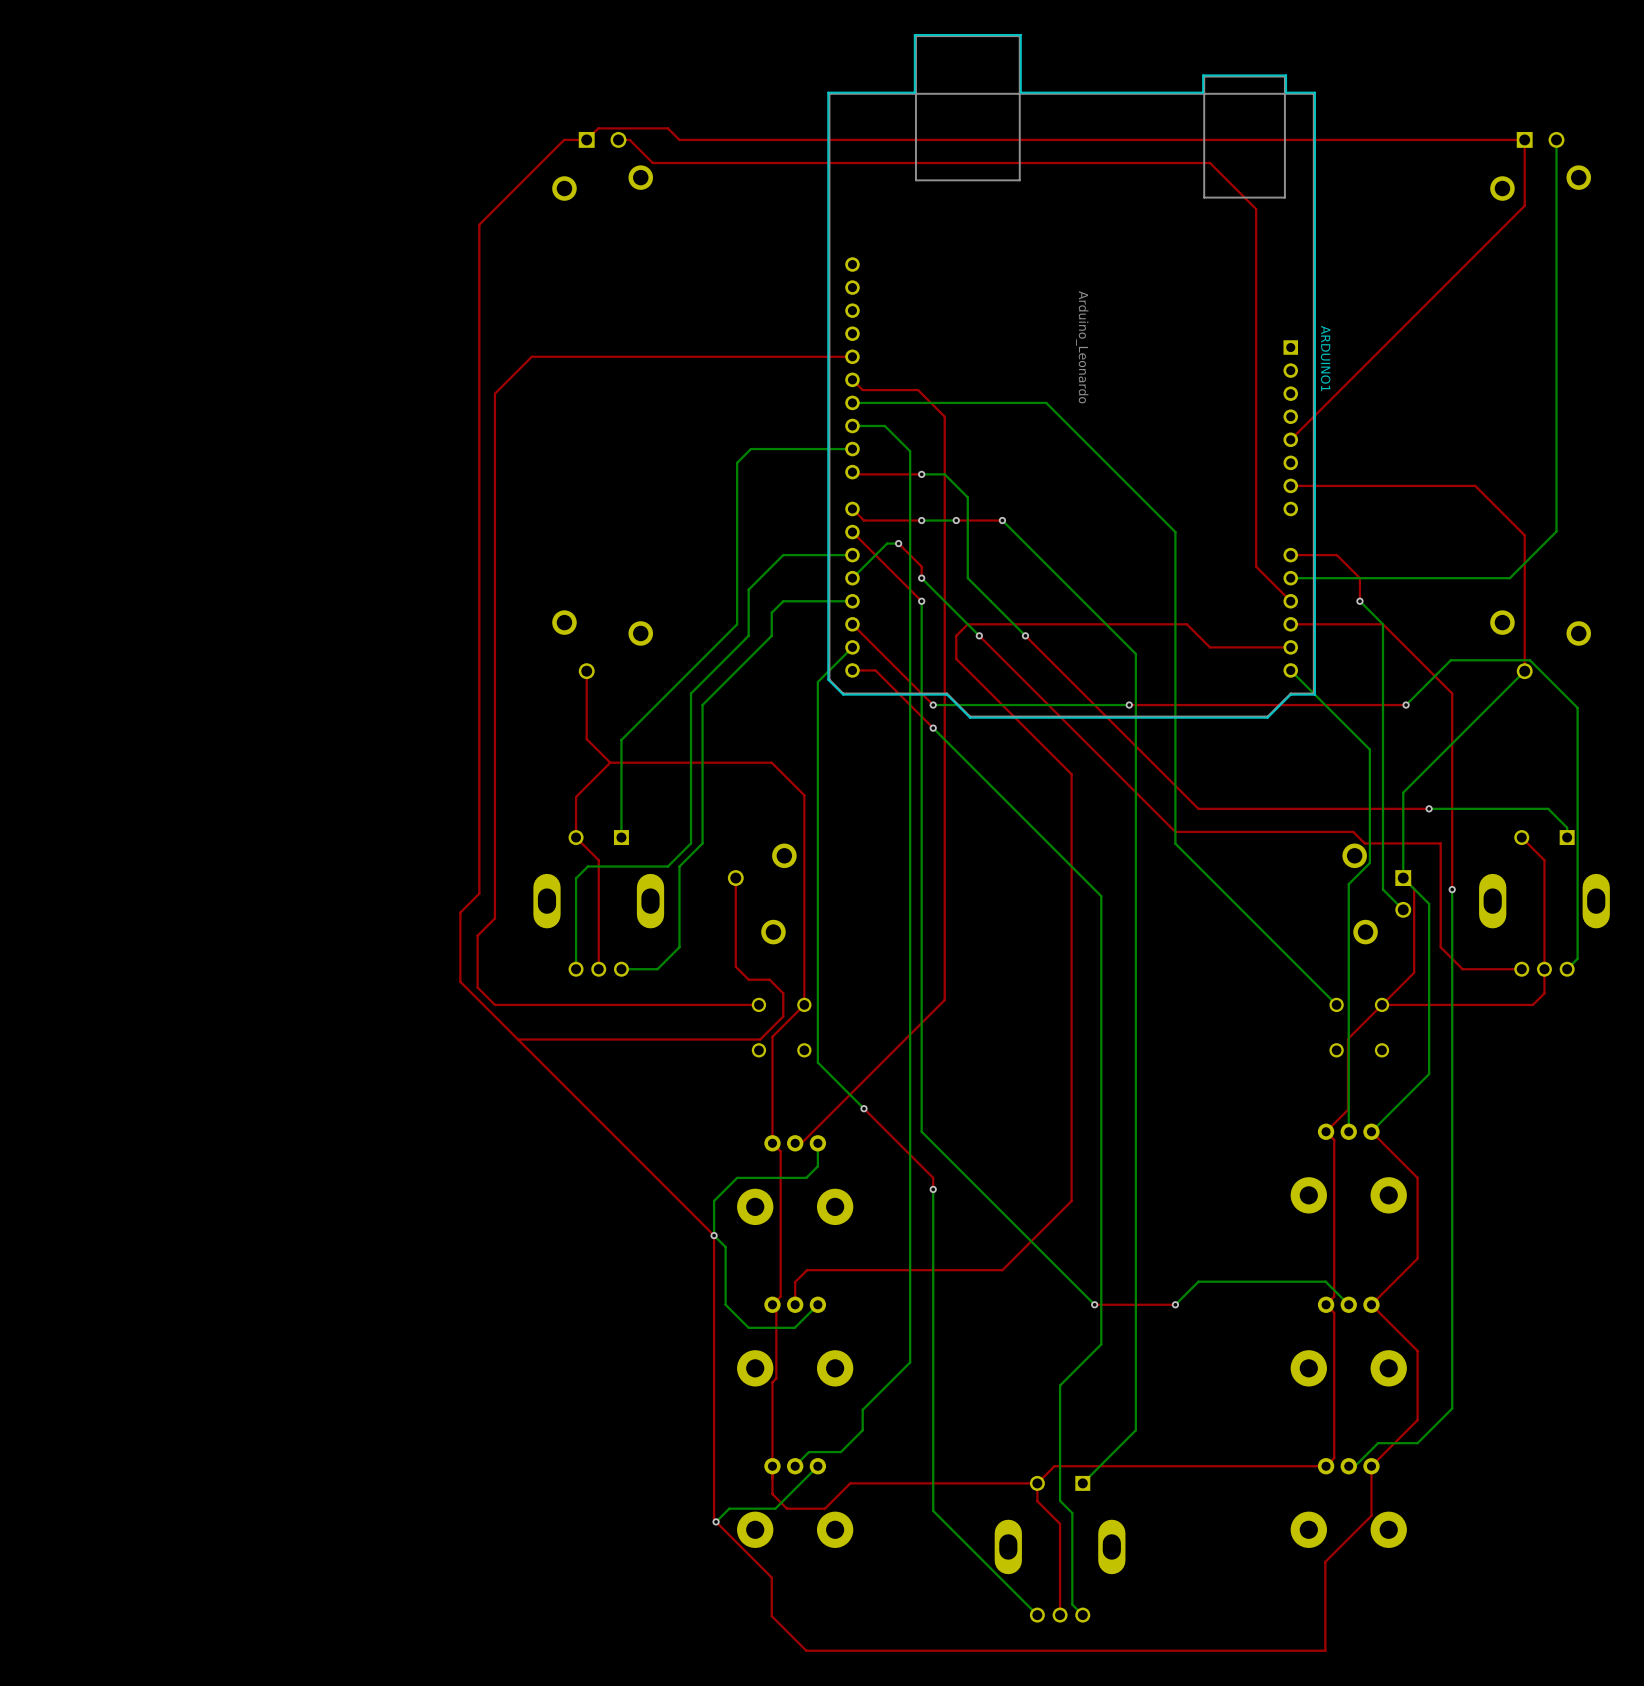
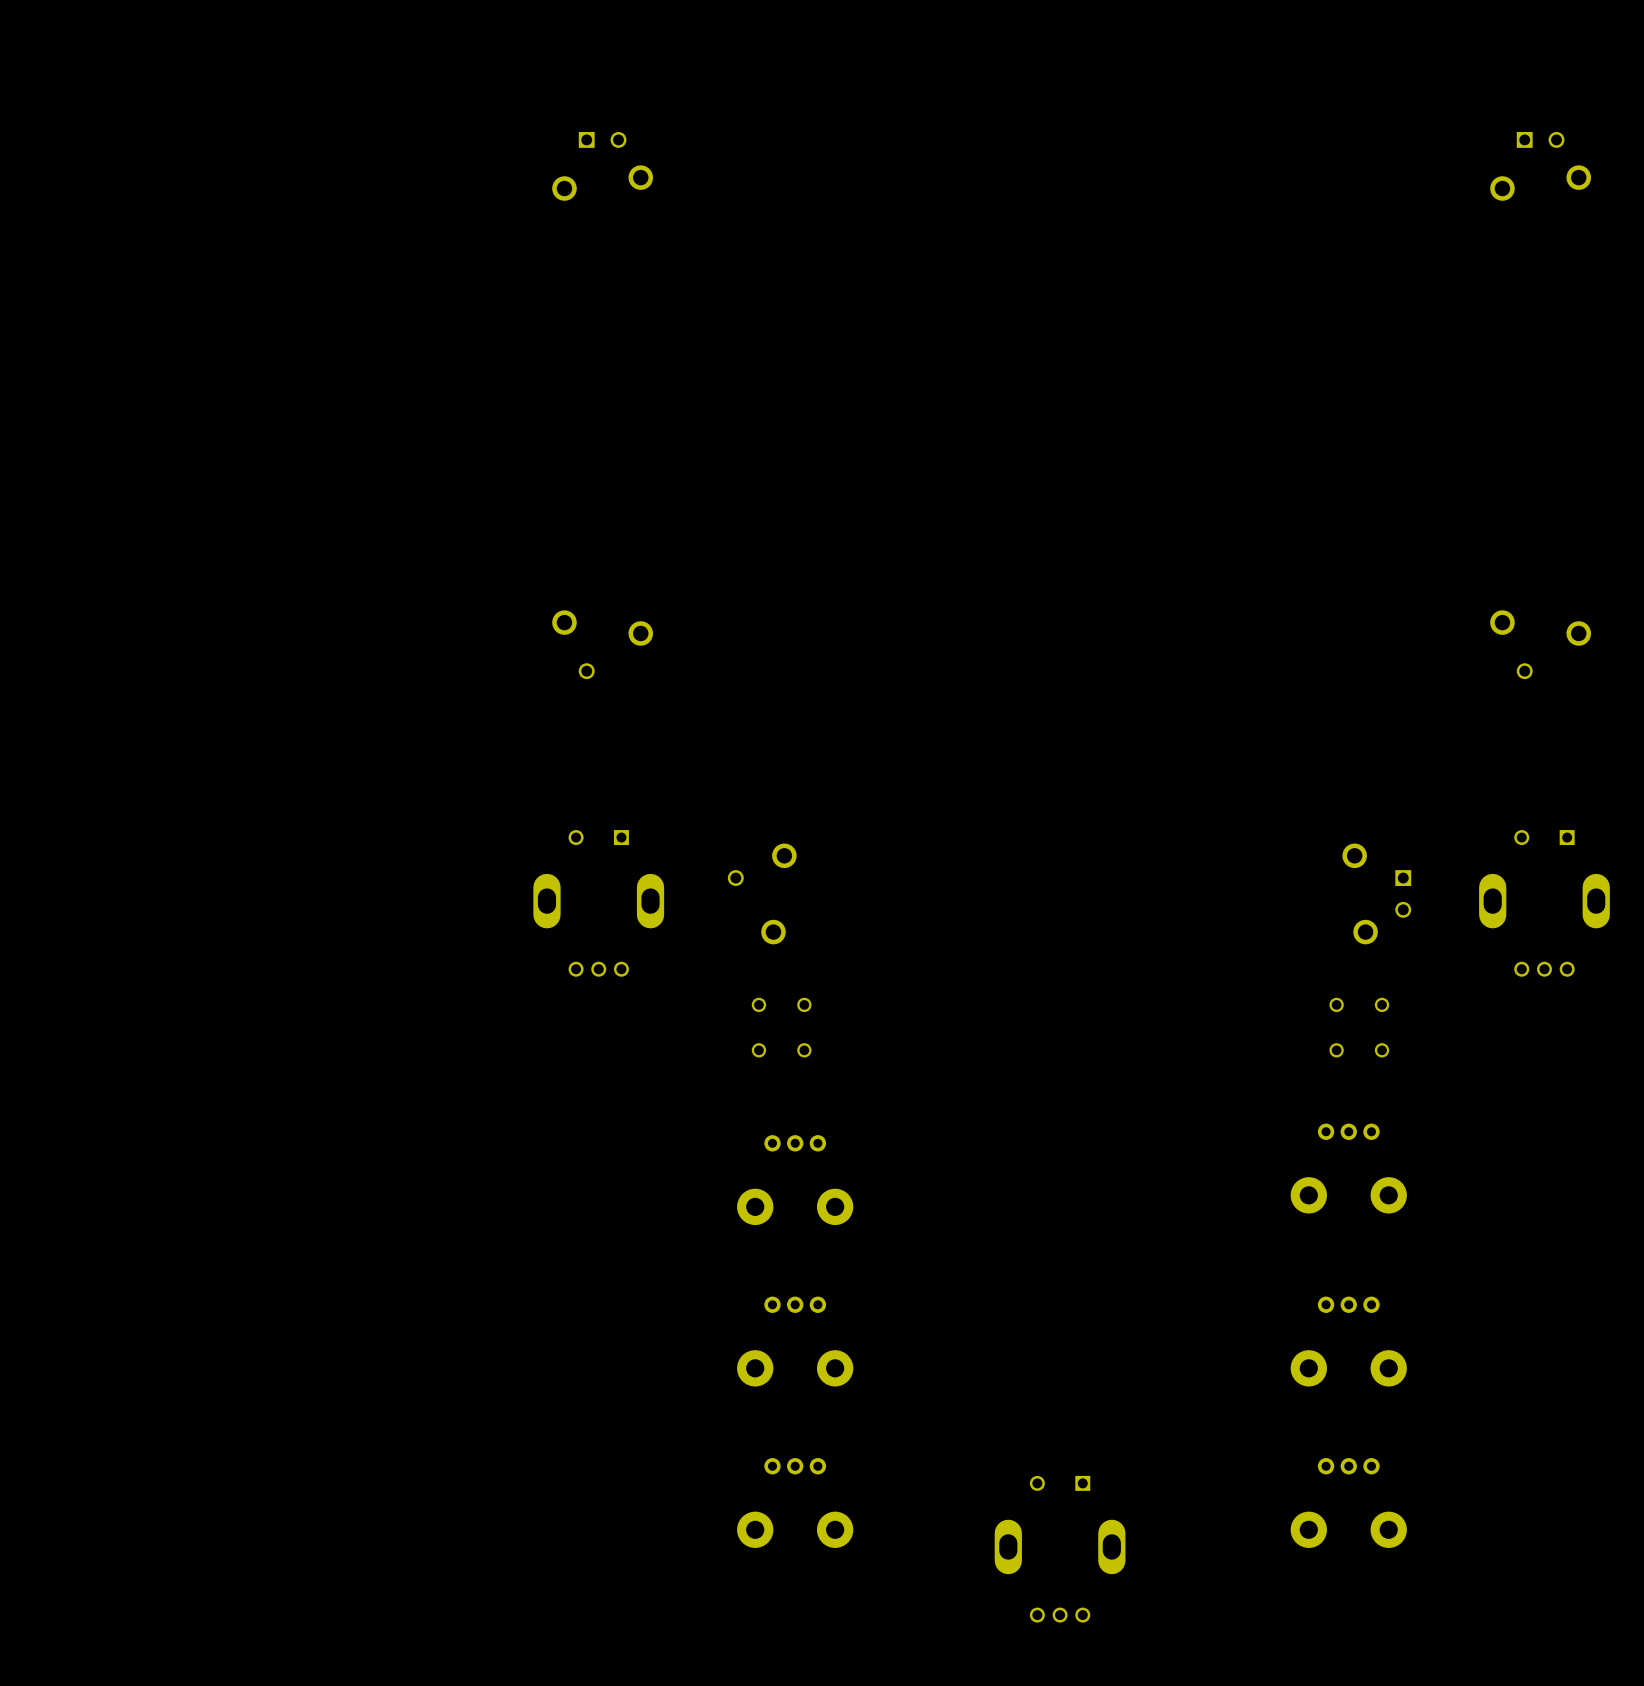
top track: (618, 139) (629, 139) (652, 162) (1210, 162) (1256, 209) (1256, 566) (1290, 601) -> none
bottom track: (1556, 139) (1556, 531) (1509, 578) (1290, 578) -> none
top track: (852, 356) (531, 356) (494, 393) (494, 918) (477, 935) (477, 987) (494, 1004) (758, 1004) -> none
ARDUINO1: Arduino_Leonardo (1071, 376) -> none
top track: (852, 379) (862, 390) (918, 390) (944, 416) (944, 999) (801, 1143) (795, 1143) -> none
bottom track: (852, 402) (1046, 402) (1175, 532) (1175, 843) (1336, 1004) -> none
bottom track: (852, 425) (884, 425) (910, 451) (910, 1362) (862, 1409) (862, 1430) (840, 1452) (808, 1452) (795, 1466) -> none
top track: (1290, 439) (1524, 205) (1524, 139) (679, 139) (667, 128) (598, 128) (586, 139) (564, 139) (479, 224) (479, 893) (460, 912) (460, 981) (714, 1235) (714, 1519) (771, 1577) (771, 1616) (806, 1650) (1325, 1650) (1325, 1561) (1371, 1515) (1371, 1466) (1417, 1420) (1417, 1350) (1371, 1304) (1417, 1258) (1417, 1177) (1371, 1131) -> none
bottom track: (852, 449) (750, 449) (737, 462) (737, 624) (621, 740) (621, 837) -> none
top track: (852, 472) (854, 474) (921, 474) -> none
bottom track: (921, 474) (944, 474) (967, 497) (967, 578) (1025, 635) -> none
via: (921, 474) -> none
top track: (1290, 485) (1475, 485) (1524, 535) (1524, 671) -> none
top track: (852, 508) (864, 520) (921, 520) -> none
via: (921, 520) -> none
bottom track: (956, 520) (921, 520) -> none
via: (956, 520) -> none
bottom track: (1002, 520) (1135, 653) (1135, 1430) (1082, 1483) -> none
top track: (1002, 520) (956, 520) -> none
via: (1002, 520) -> none
top track: (852, 532) (921, 601) -> none
bottom track: (898, 543) (887, 543) (852, 578) -> none
top track: (898, 543) (921, 566) (921, 578) -> none
via: (898, 543) -> none
bottom track: (852, 555) (783, 555) (748, 589) (748, 635) (691, 693) (691, 843) (667, 866) (587, 866) (576, 878) (576, 969) -> none
top track: (1290, 555) (1336, 555) (1359, 578) (1359, 601) -> none
bottom track: (921, 578) (979, 635) -> none
via: (921, 578) -> none
bottom track: (852, 601) (783, 601) (771, 612) (771, 635) (702, 705) (702, 843) (679, 866) (679, 947) (657, 969) (621, 969) -> none
bottom track: (921, 601) (921, 1131) (1094, 1304) -> none
via: (921, 601) -> none
bottom track: (1359, 601) (1383, 624) (1383, 889) (1403, 909) -> none
via: (1359, 601) -> none
top track: (852, 624) (933, 705) -> none
top track: (1290, 624) (1383, 624) (1452, 693) (1452, 889) -> none
top track: (979, 635) (1175, 831) (1353, 831) (1364, 843) (1440, 843) (1440, 947) (1462, 969) (1521, 969) -> none
via: (979, 635) -> none
top track: (1025, 635) (1198, 808) (1429, 808) -> none
via: (1025, 635) -> none
bottom track: (852, 647) (817, 681) (817, 1062) (864, 1108) -> none
top track: (1290, 647) (1210, 647) (1186, 624) (967, 624) (956, 635) (956, 658) (1071, 774) (1071, 1200) (1002, 1270) (807, 1270) (795, 1282) (795, 1304) -> none
top track: (852, 670) (875, 670) (933, 728) -> none
bottom track: (1290, 670) (1369, 749) (1369, 863) (1348, 884) (1348, 1131) -> none
top track: (586, 671) (586, 739) (610, 762) -> none
bottom track: (1524, 671) (1403, 792) (1403, 873) -> none
via: (933, 705) -> none
bottom track: (1129, 705) (933, 705) -> none
via: (1129, 705) -> none
bottom track: (1406, 705) (1450, 660) (1529, 660) (1577, 707) (1577, 958) (1567, 969) -> none
top track: (1406, 705) (1129, 705) -> none
via: (1406, 705) -> none
bottom track: (933, 728) (1101, 896) (1101, 1344) (1060, 1385) (1060, 1500) (1072, 1513) (1072, 1604) (1082, 1615) -> none
via: (933, 728) -> none
top track: (610, 762) (771, 762) (804, 795) (804, 1004) (772, 1036) (772, 1143) (780, 1151) (780, 1296) (772, 1304) (776, 1308) (776, 1378) (772, 1382) (772, 1494) (786, 1508) (825, 1508) (850, 1483) (1037, 1483) -> none
top track: (610, 762) (576, 796) (576, 837) (598, 860) (598, 969) -> none
bottom track: (1429, 808) (1548, 808) (1567, 827) (1567, 837) -> none
via: (1429, 808) -> none
top track: (1521, 837) (1544, 860) (1544, 993) (1532, 1004) (1382, 1004) -> none
top track: (741, 878) (735, 878) (735, 966) (748, 979) (769, 979) (783, 993) (783, 1016) (760, 1039) (518, 1039) -> none
bottom track: (1403, 878) (1429, 903) (1429, 1074) (1371, 1131) -> none
top track: (1403, 878) (1414, 888) (1414, 972) (1347, 1038) (1347, 1109) (1326, 1131) (1334, 1139) (1334, 1296) (1326, 1304) (1334, 1312) (1334, 1458) (1326, 1466) (1054, 1466) (1037, 1483) -> none
bottom track: (1452, 889) (1452, 1408) (1417, 1443) (1378, 1443) (1355, 1466) (1348, 1466) -> none
via: (1452, 889) -> none
top track: (864, 1108) (933, 1177) (933, 1189) -> none
via: (864, 1108) -> none
bottom track: (817, 1143) (817, 1166) (806, 1177) (737, 1177) (714, 1200) (714, 1235) (725, 1247) (725, 1304) (748, 1327) (794, 1327) (817, 1304) -> none
bottom track: (933, 1189) (933, 1510) (1037, 1615) -> none
via: (933, 1189) -> none
via: (714, 1235) -> none
via: (1094, 1304) -> none
top track: (1175, 1304) (1094, 1304) -> none
via: (1175, 1304) -> none
bottom track: (1348, 1304) (1325, 1281) (1198, 1281) (1175, 1304) -> none
bottom track: (817, 1466) (775, 1508) (729, 1508) (716, 1521) -> none
top track: (1037, 1483) (1037, 1501) (1060, 1523) (1060, 1615) -> none
via: (716, 1521) -> none

